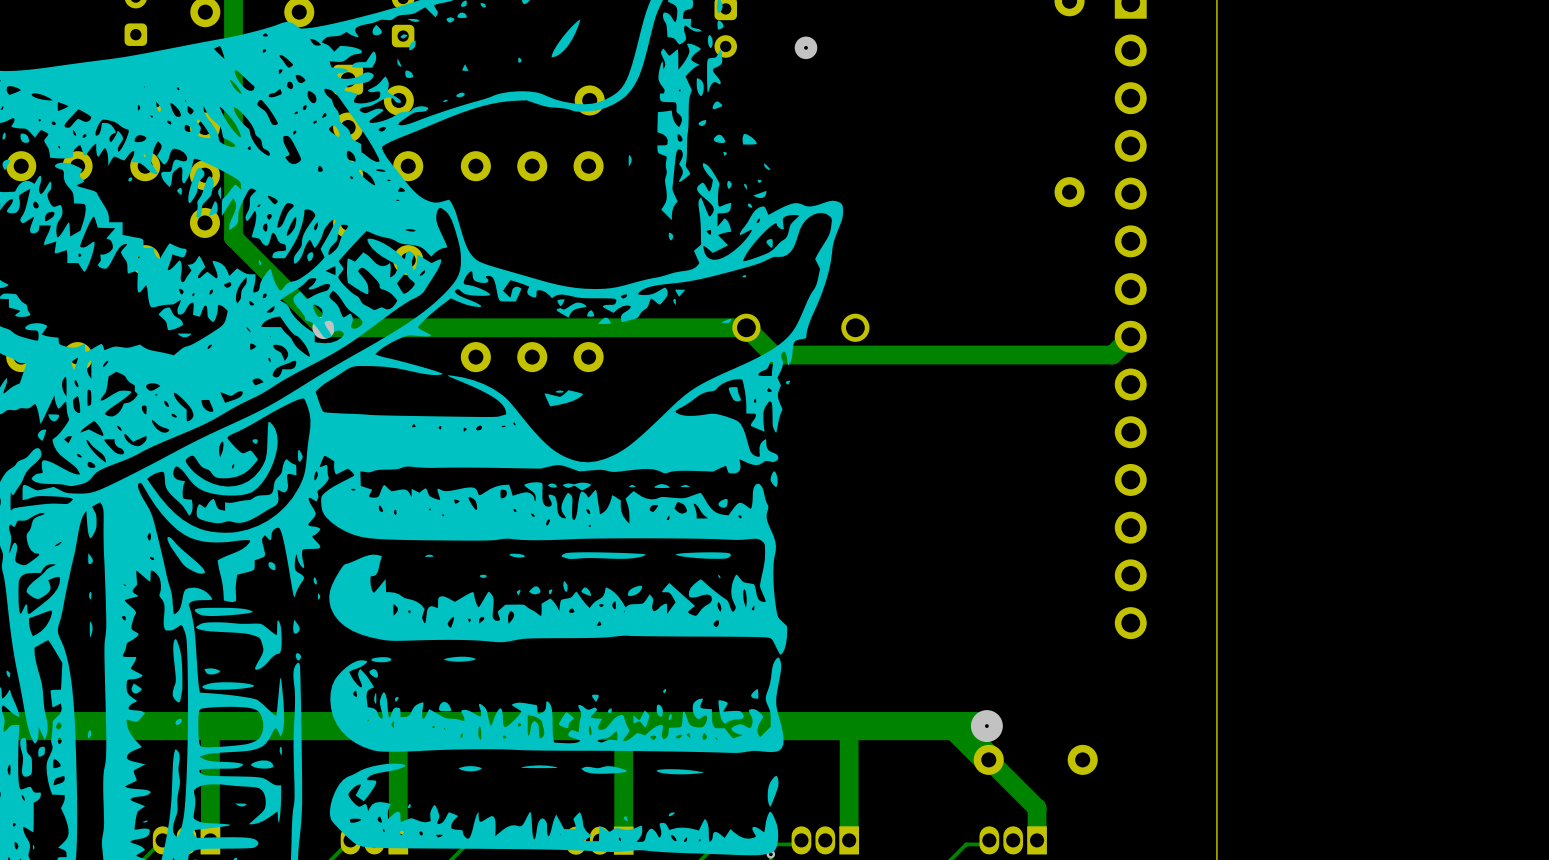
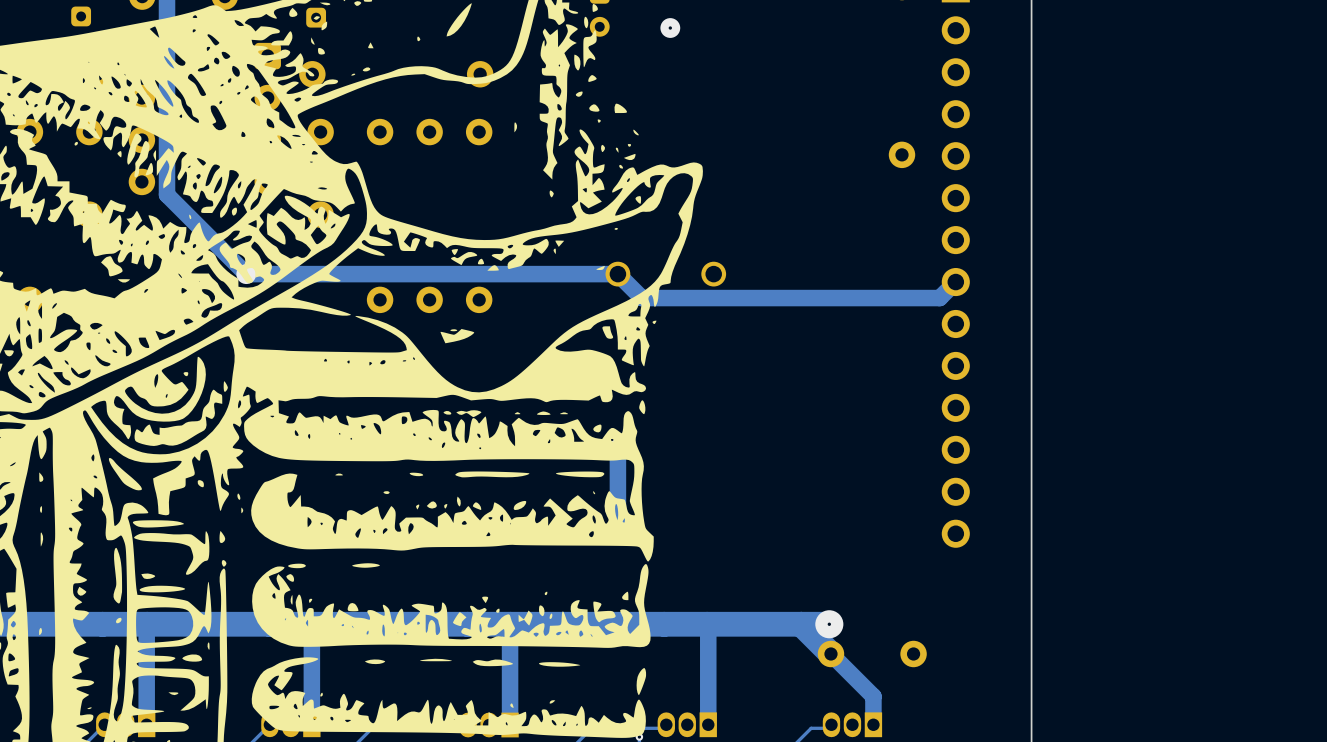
track: none -> (617, 449) (617, 531)

